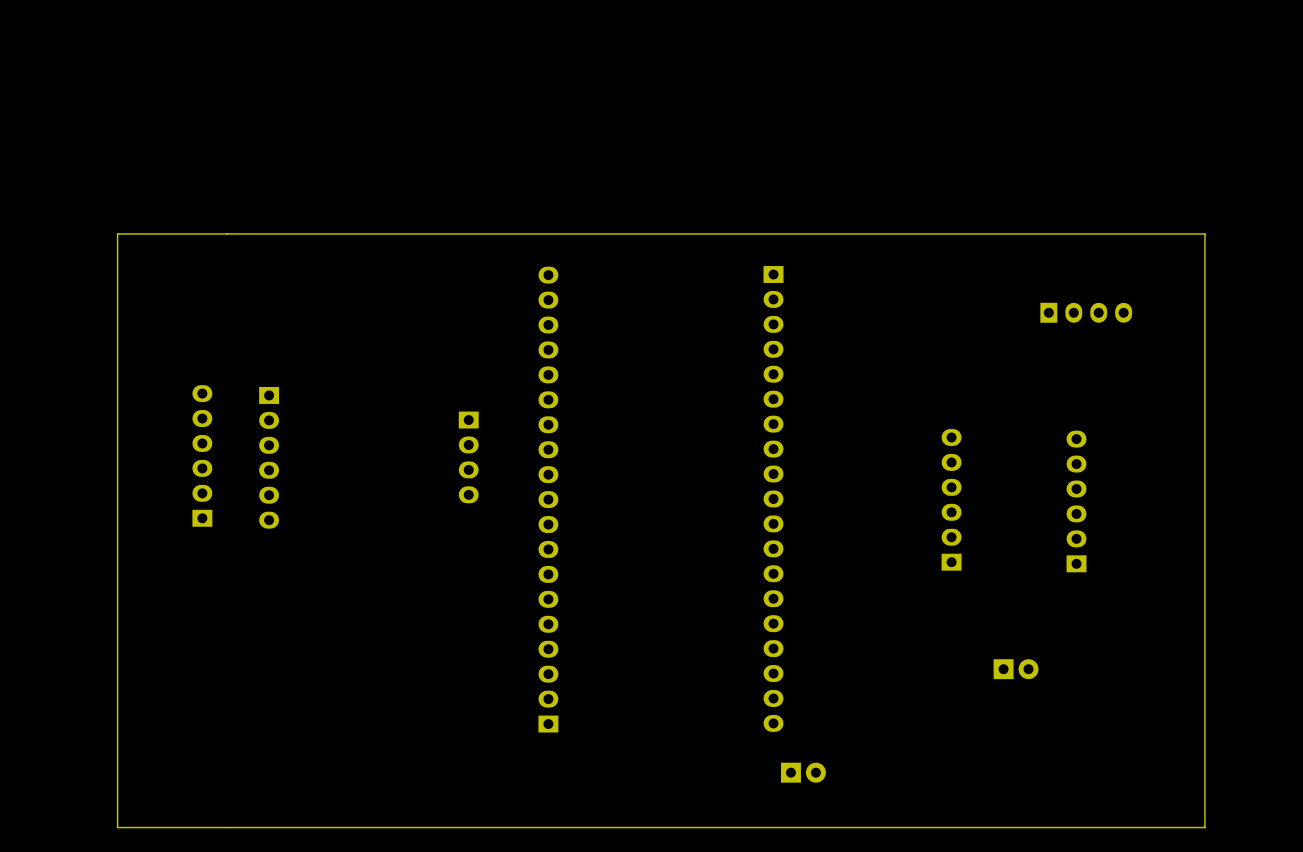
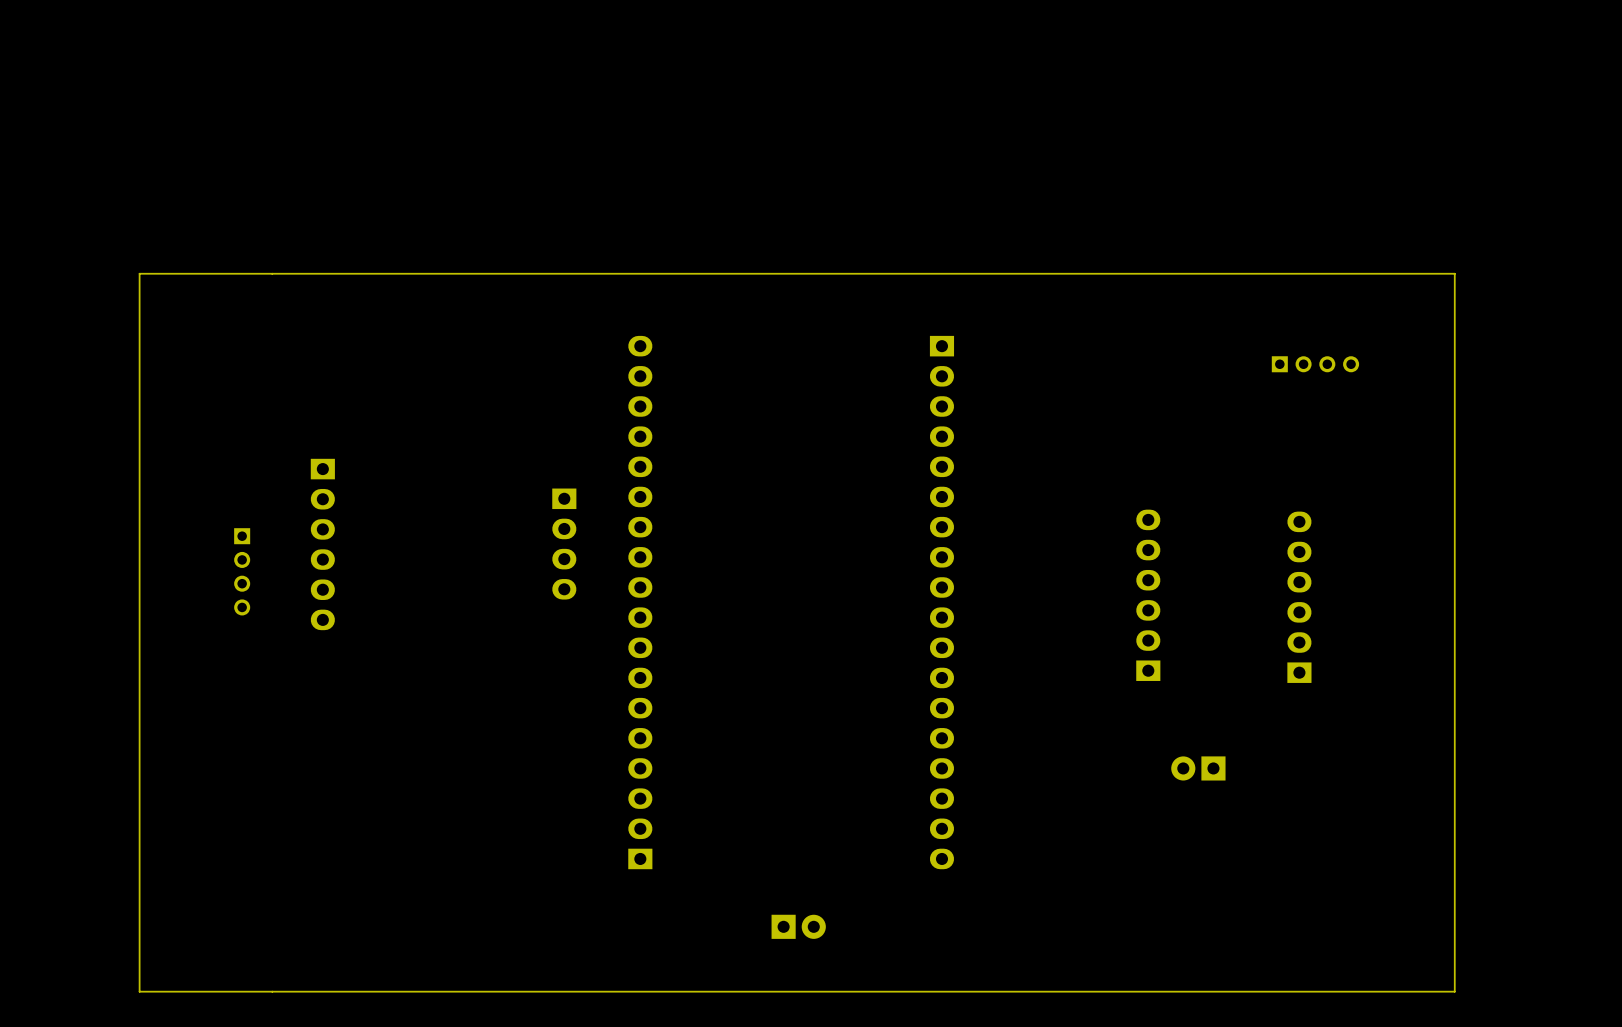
part footprint: [1040, 302, 1133, 323] -> [1271, 356, 1360, 373]
part: (202, 455) -> none
part: none -> (242, 571)
part: (773, 498) -> none
part: (548, 499) -> none
part: none -> (640, 602)
part: none -> (941, 602)
part rotation: 0° (1016, 669) -> 180° (1198, 768)
part position: (1016, 669) -> (1198, 768)
part: (803, 772) -> none
part: none -> (798, 926)

